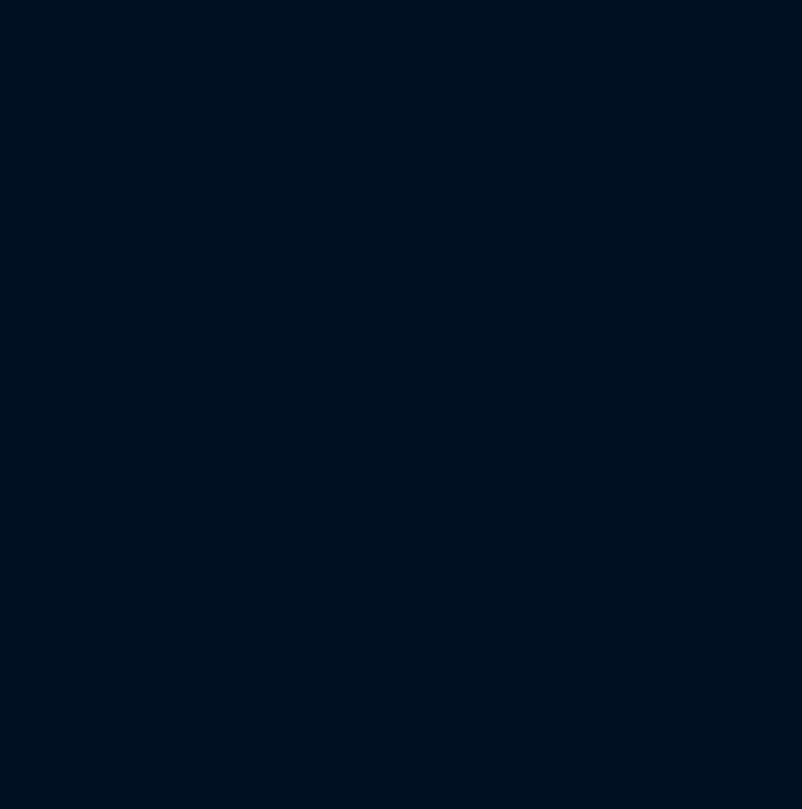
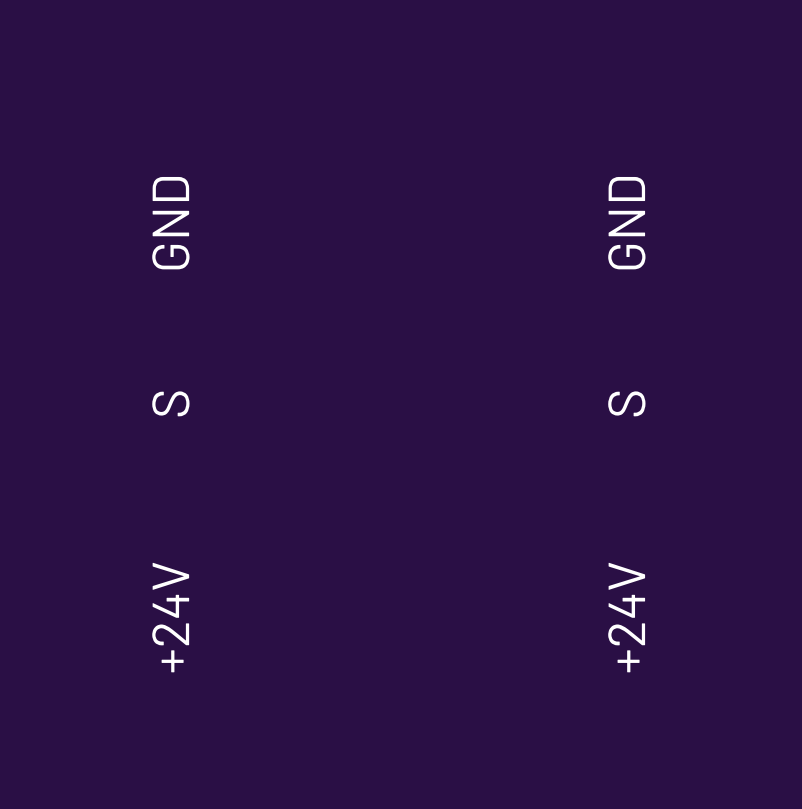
text: none -> GND (170, 223)
text: none -> GND (626, 223)
text: none -> S (170, 403)
text: none -> S (626, 403)
text: none -> +24V (170, 617)
text: none -> +24V (626, 617)

